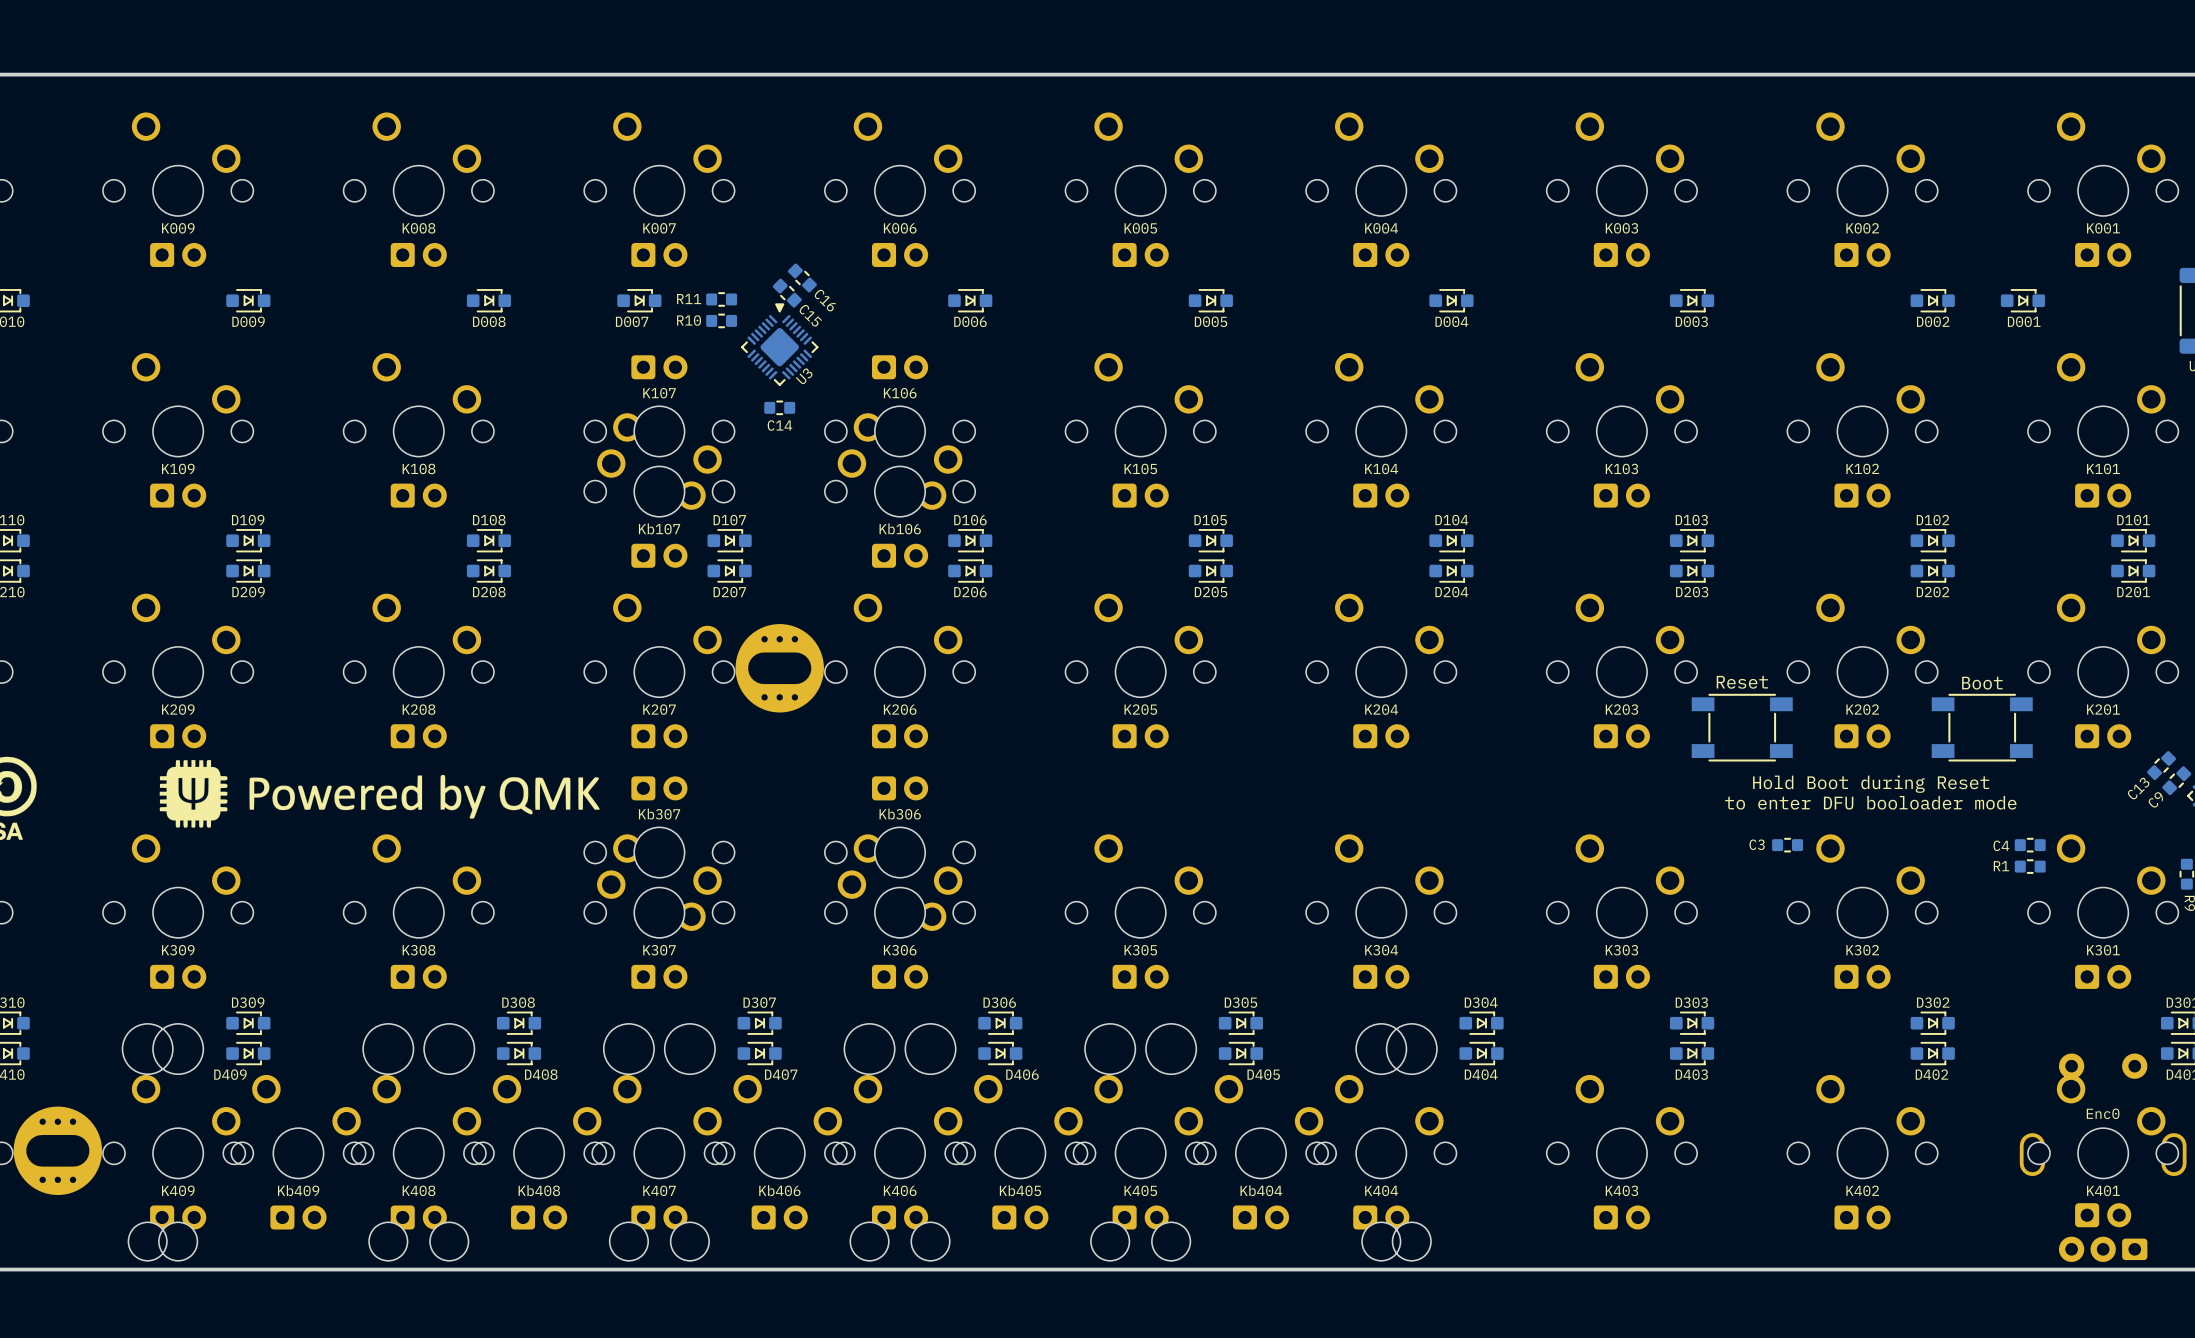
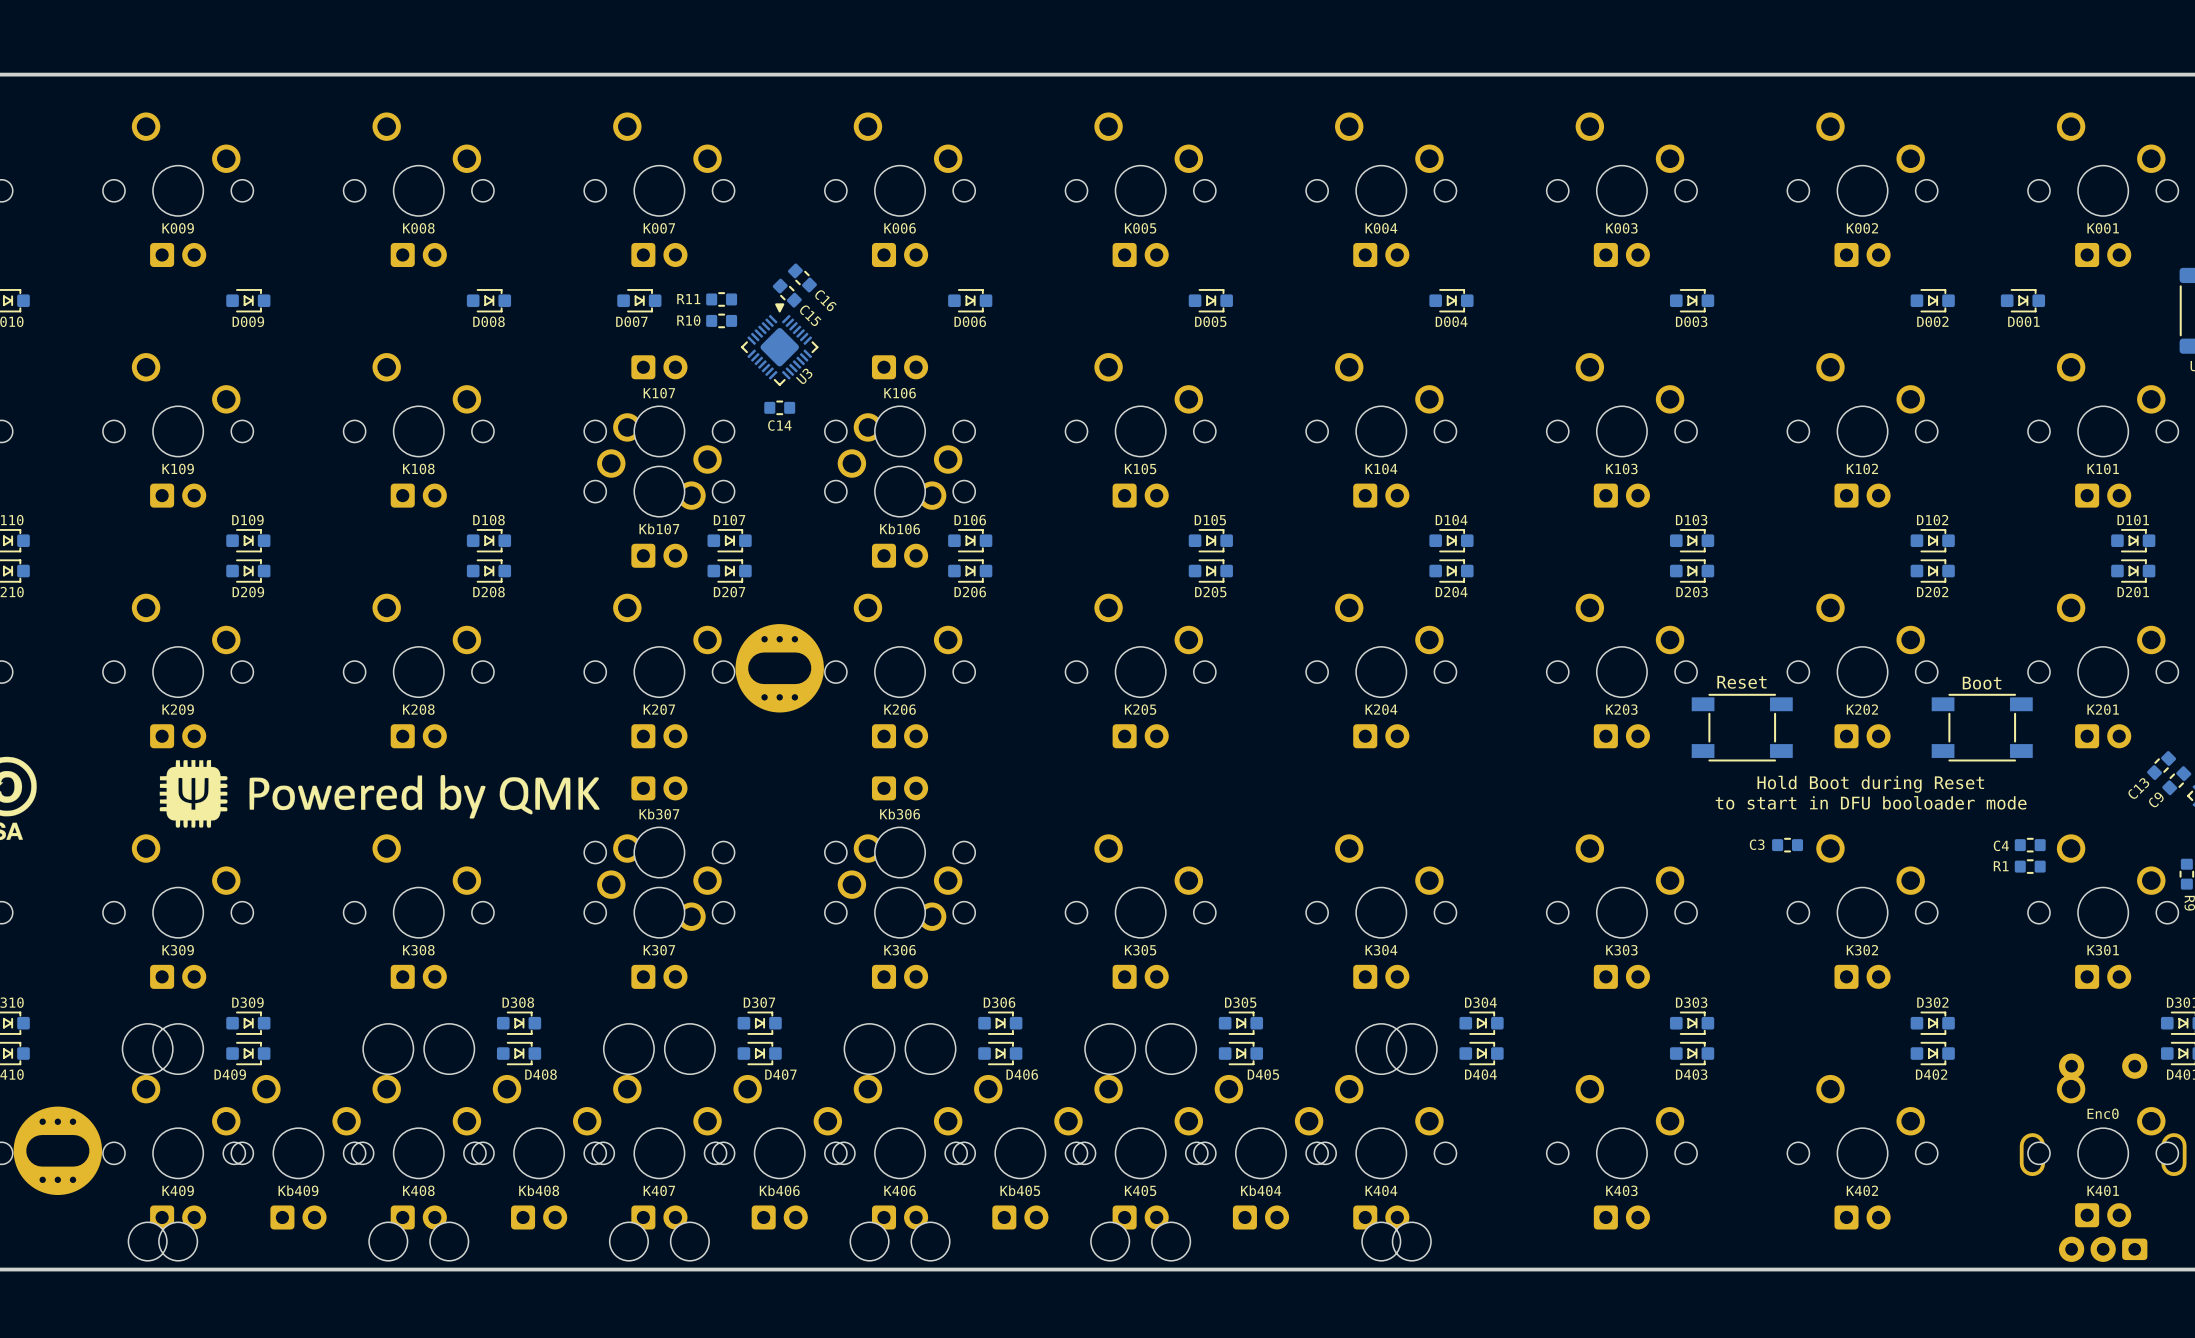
text: to enter DFU booloader mode (1870, 802) -> to start in DFU booloader mode (1871, 802)

